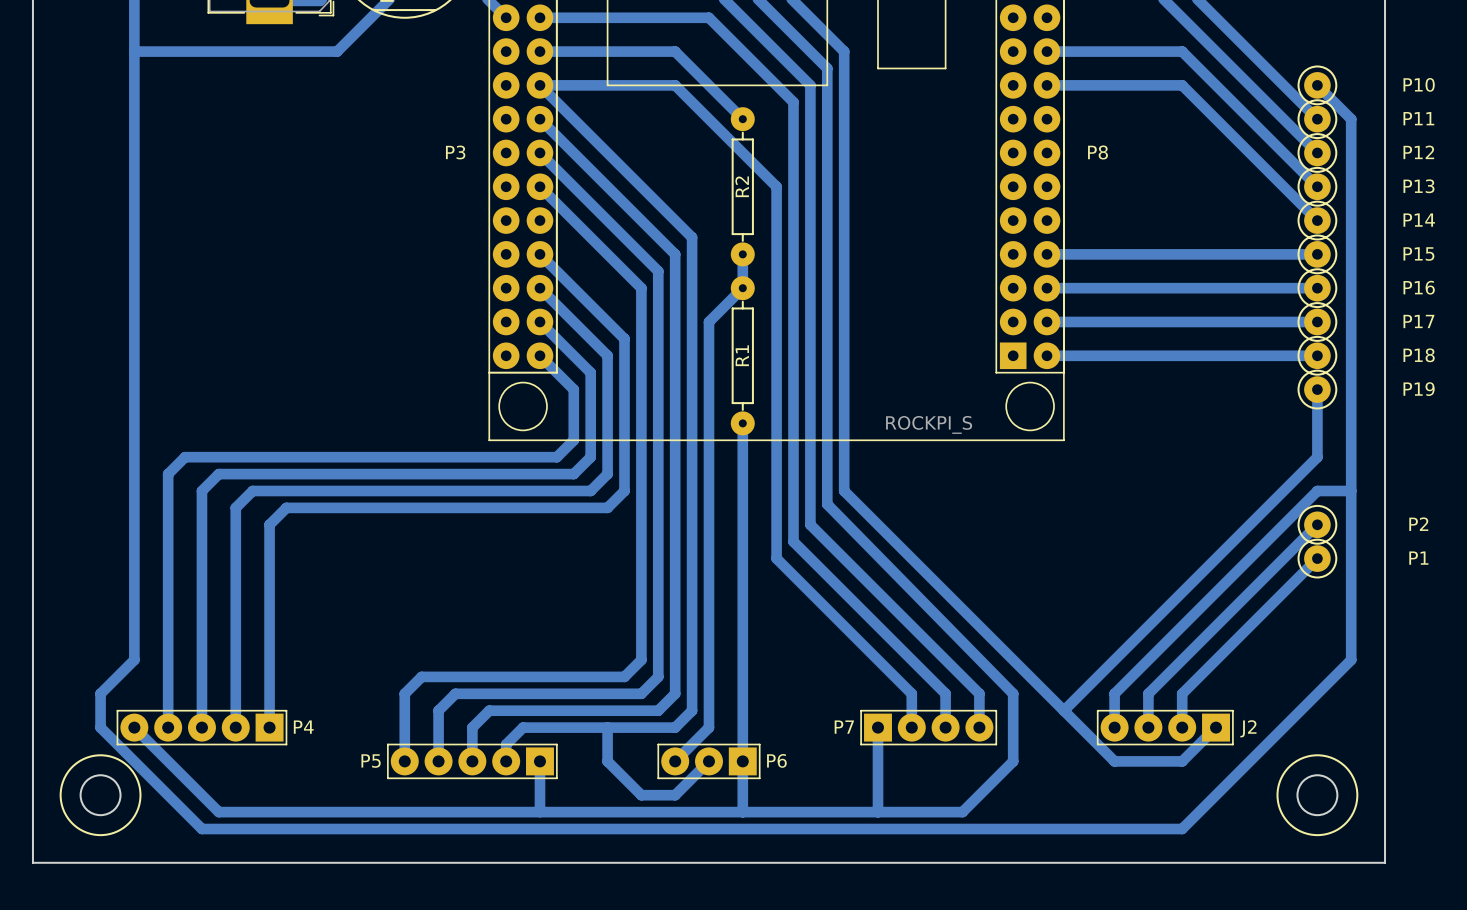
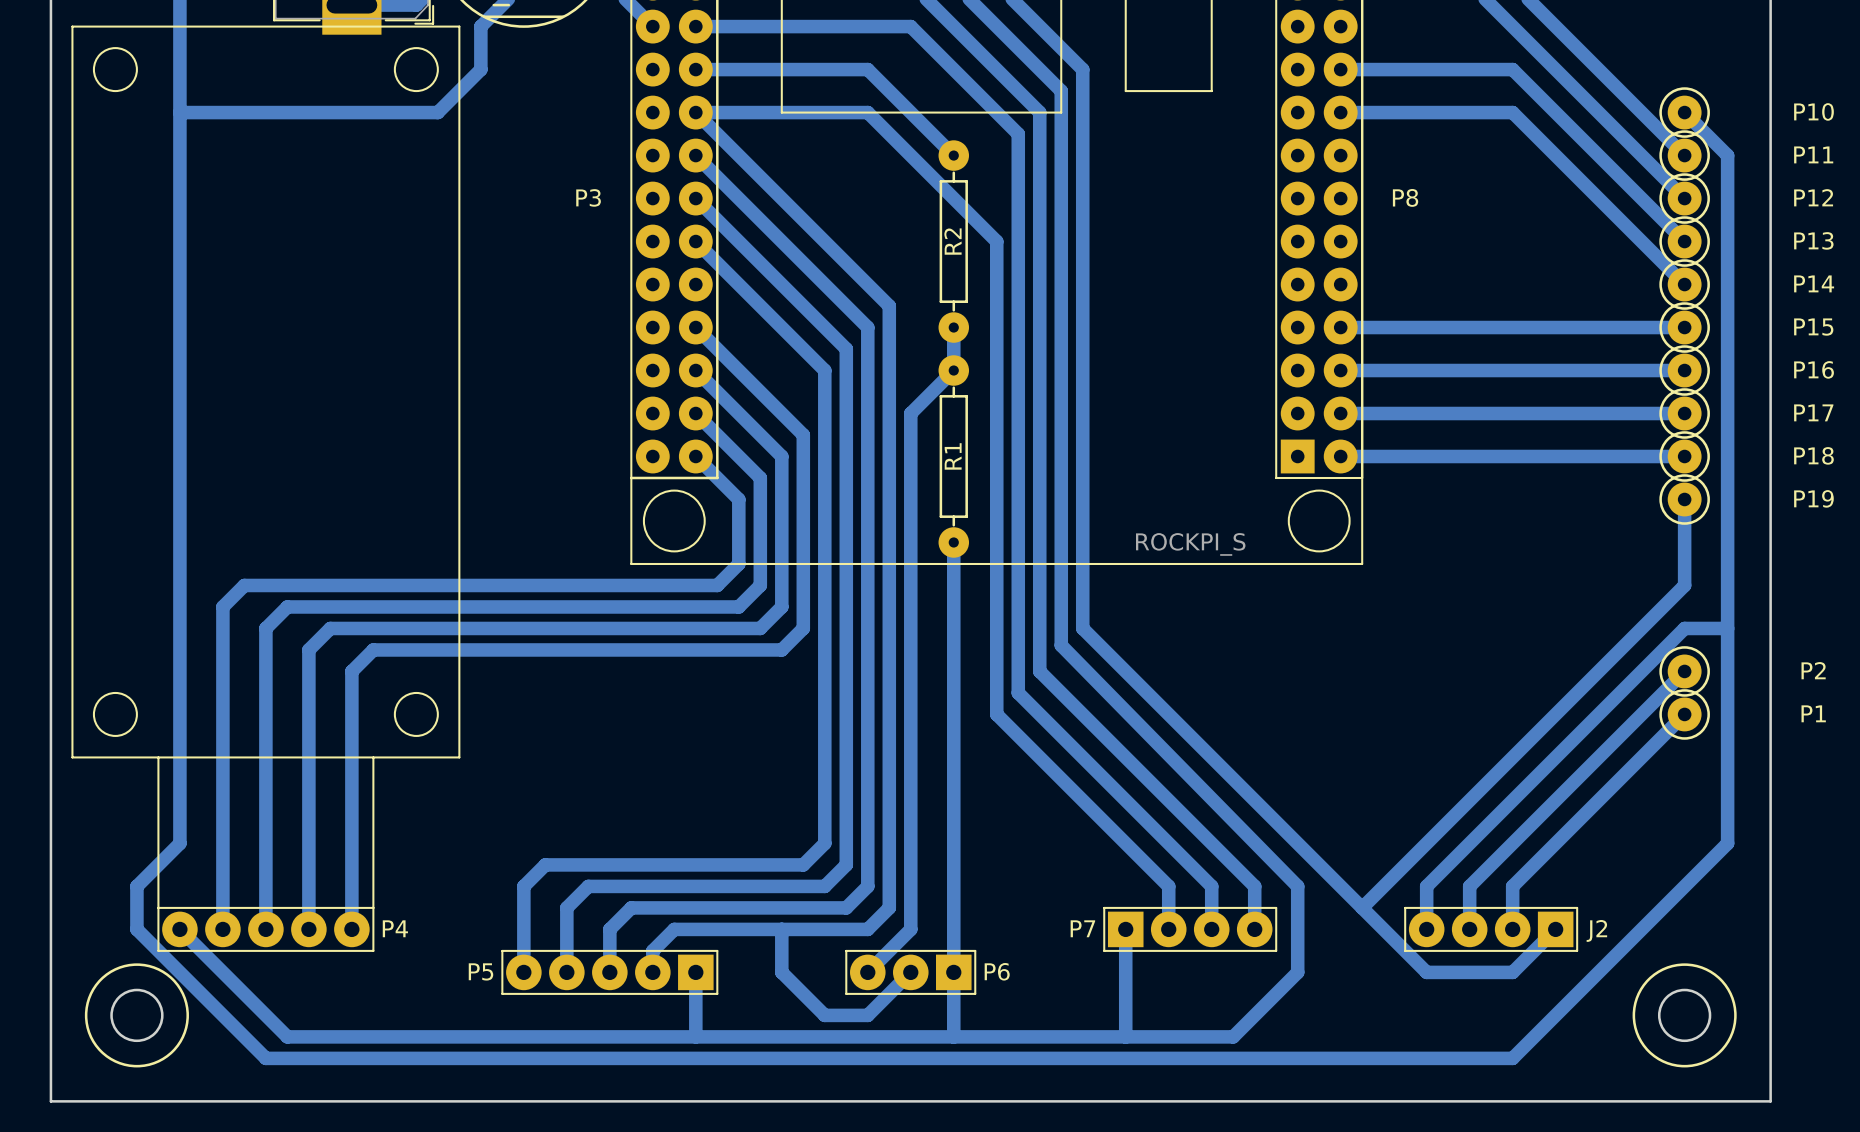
bottom track: (370, 17) (337, 51) (134, 51) -> (480, 26) (480, 69) (437, 112) (179, 112)
P4 footprint: [116, 709, 288, 746] -> [71, 25, 461, 952]

